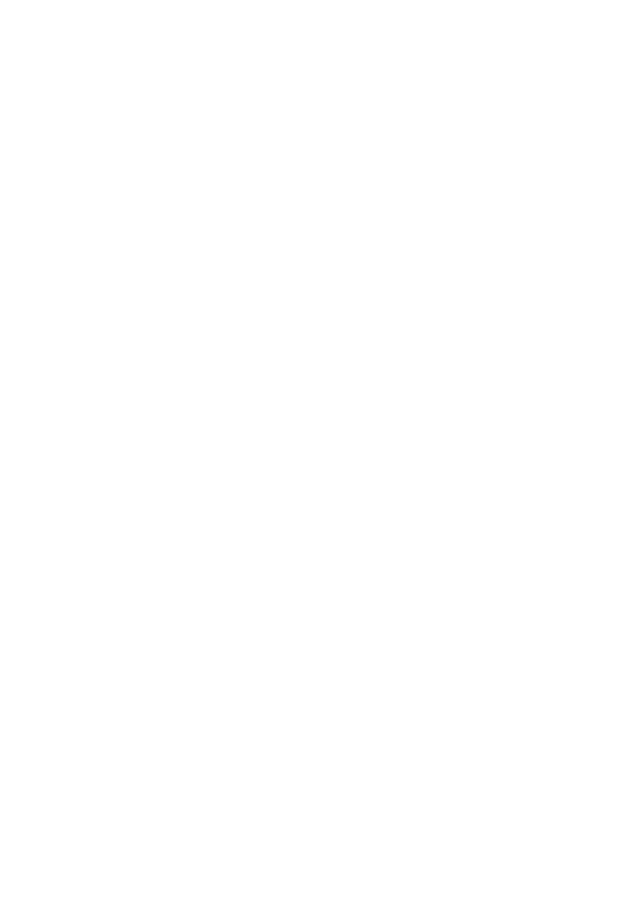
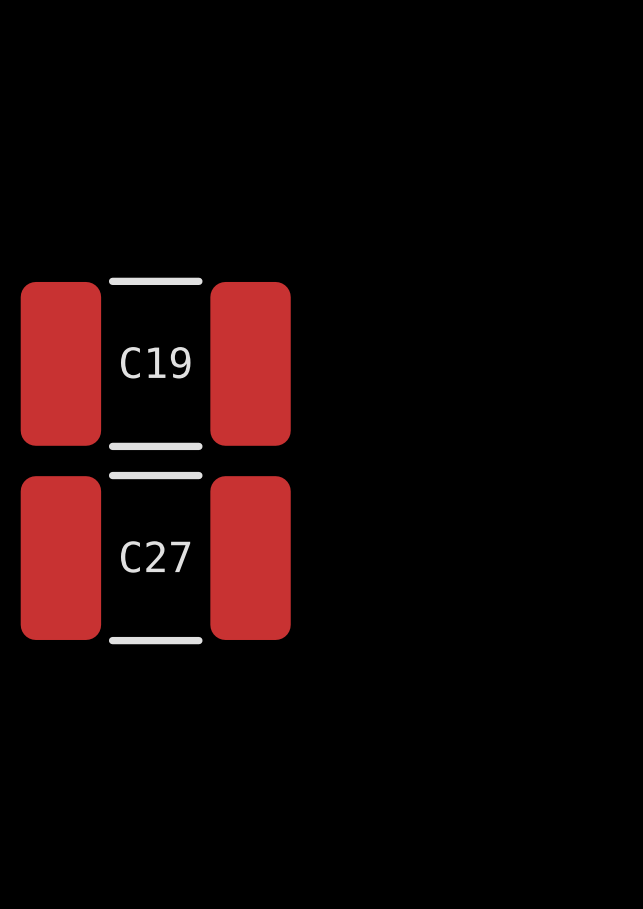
C19: none -> (155, 363)
C27: none -> (155, 558)

